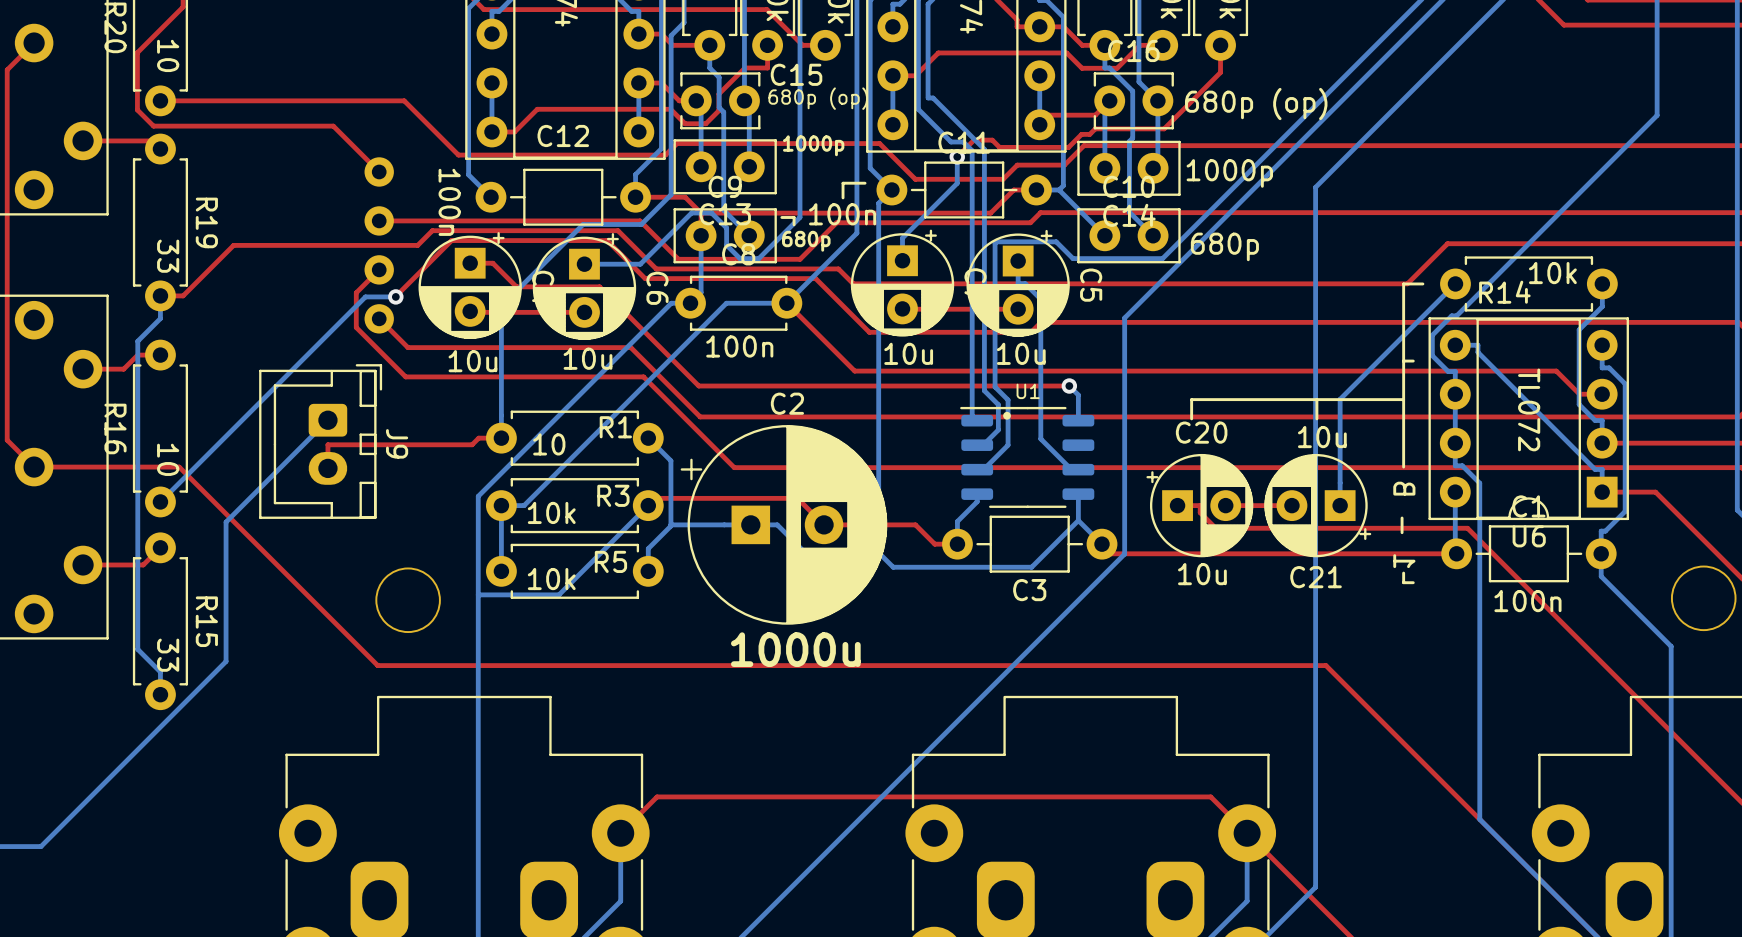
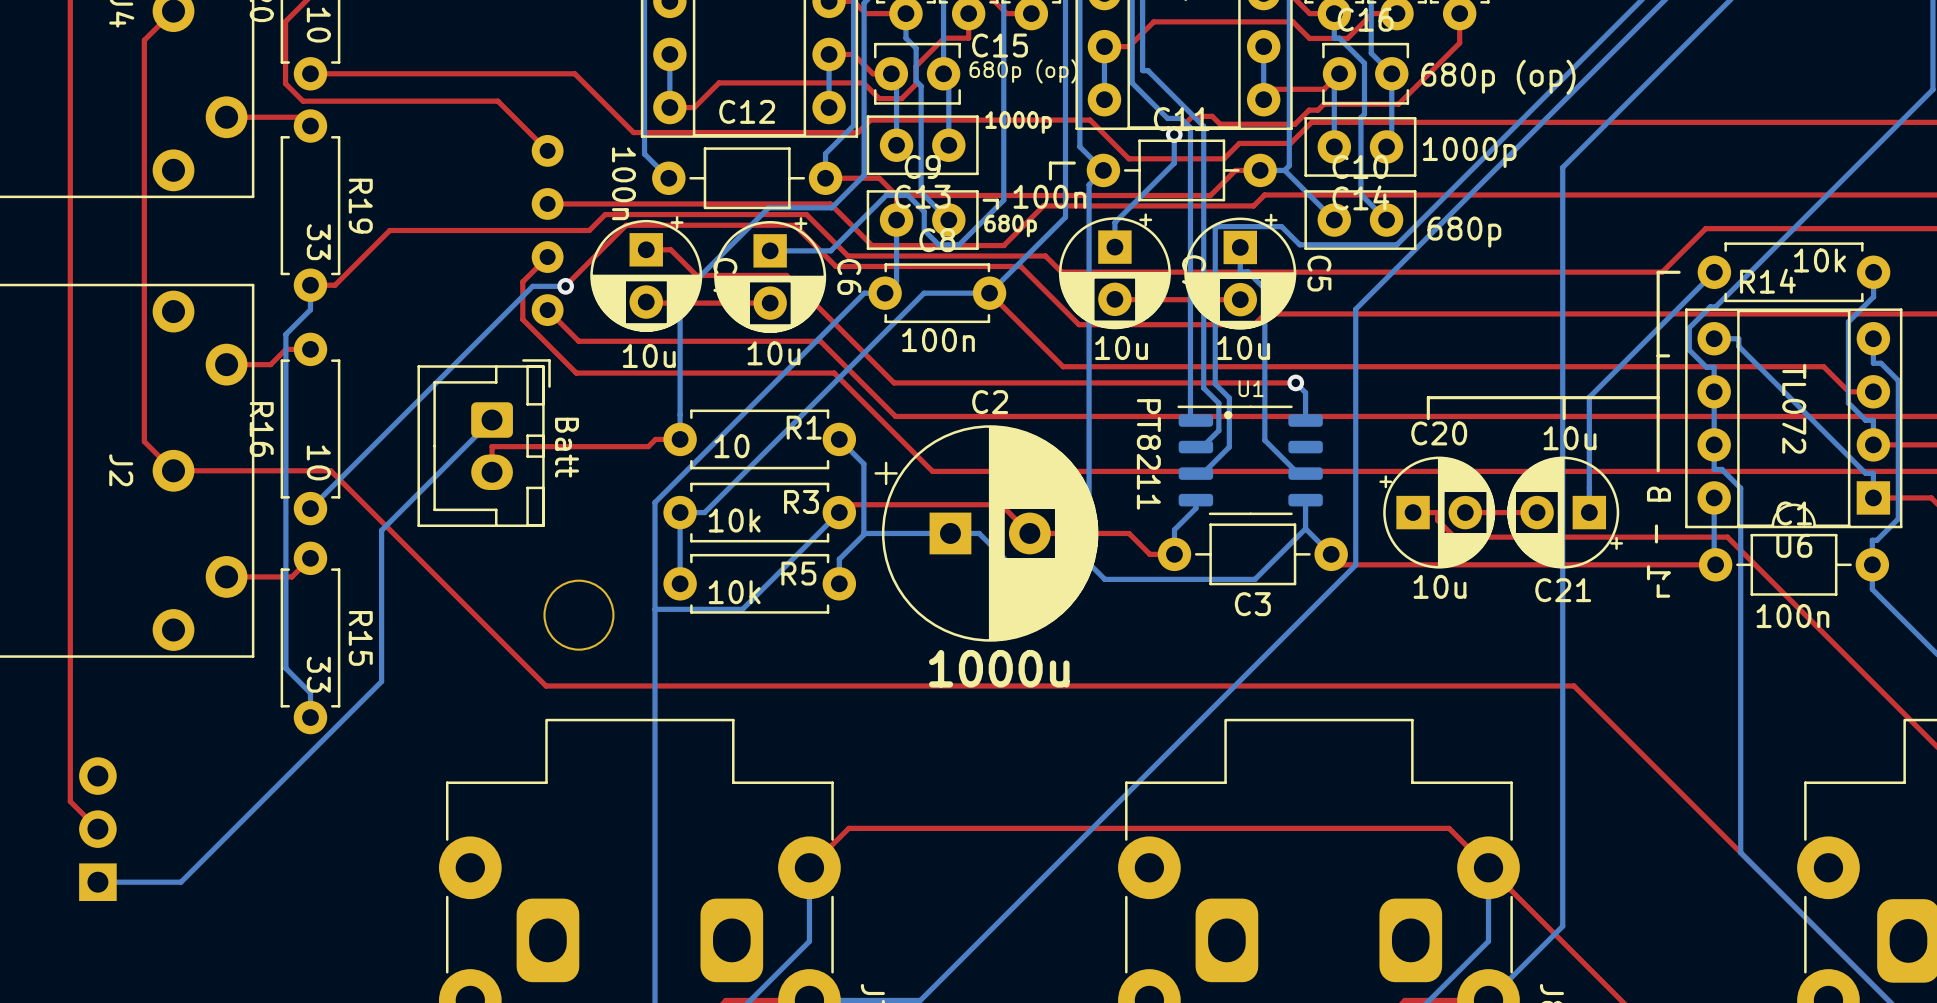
J9 name: J9 (397, 443) -> Batt (567, 447)
text: none -> PT8211 (1148, 454)

